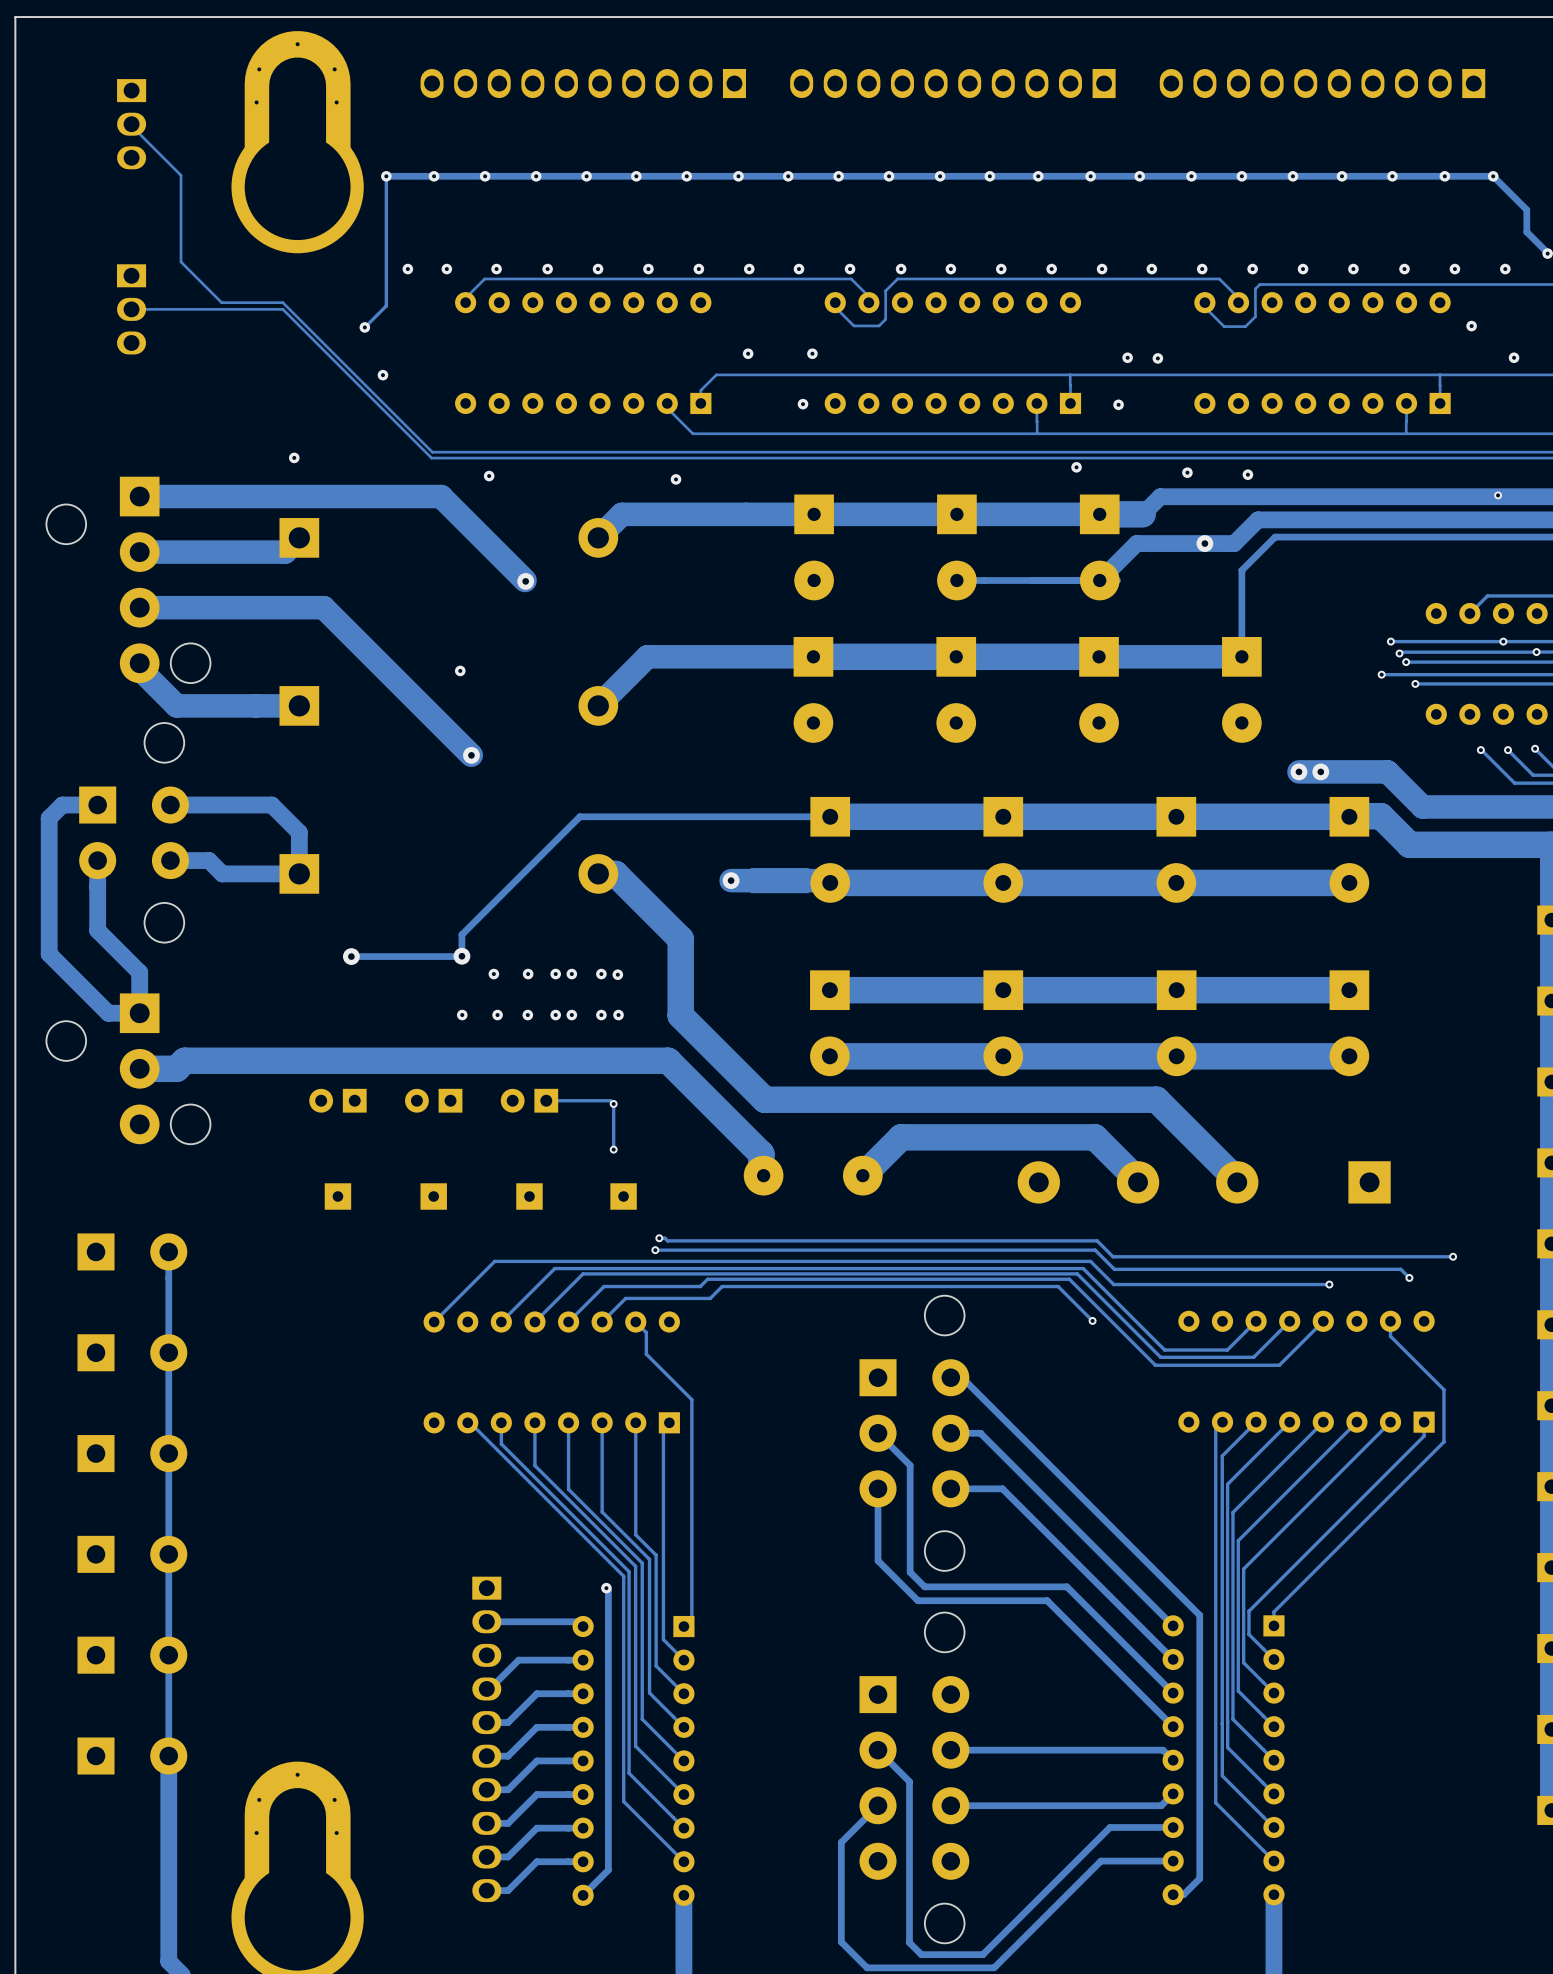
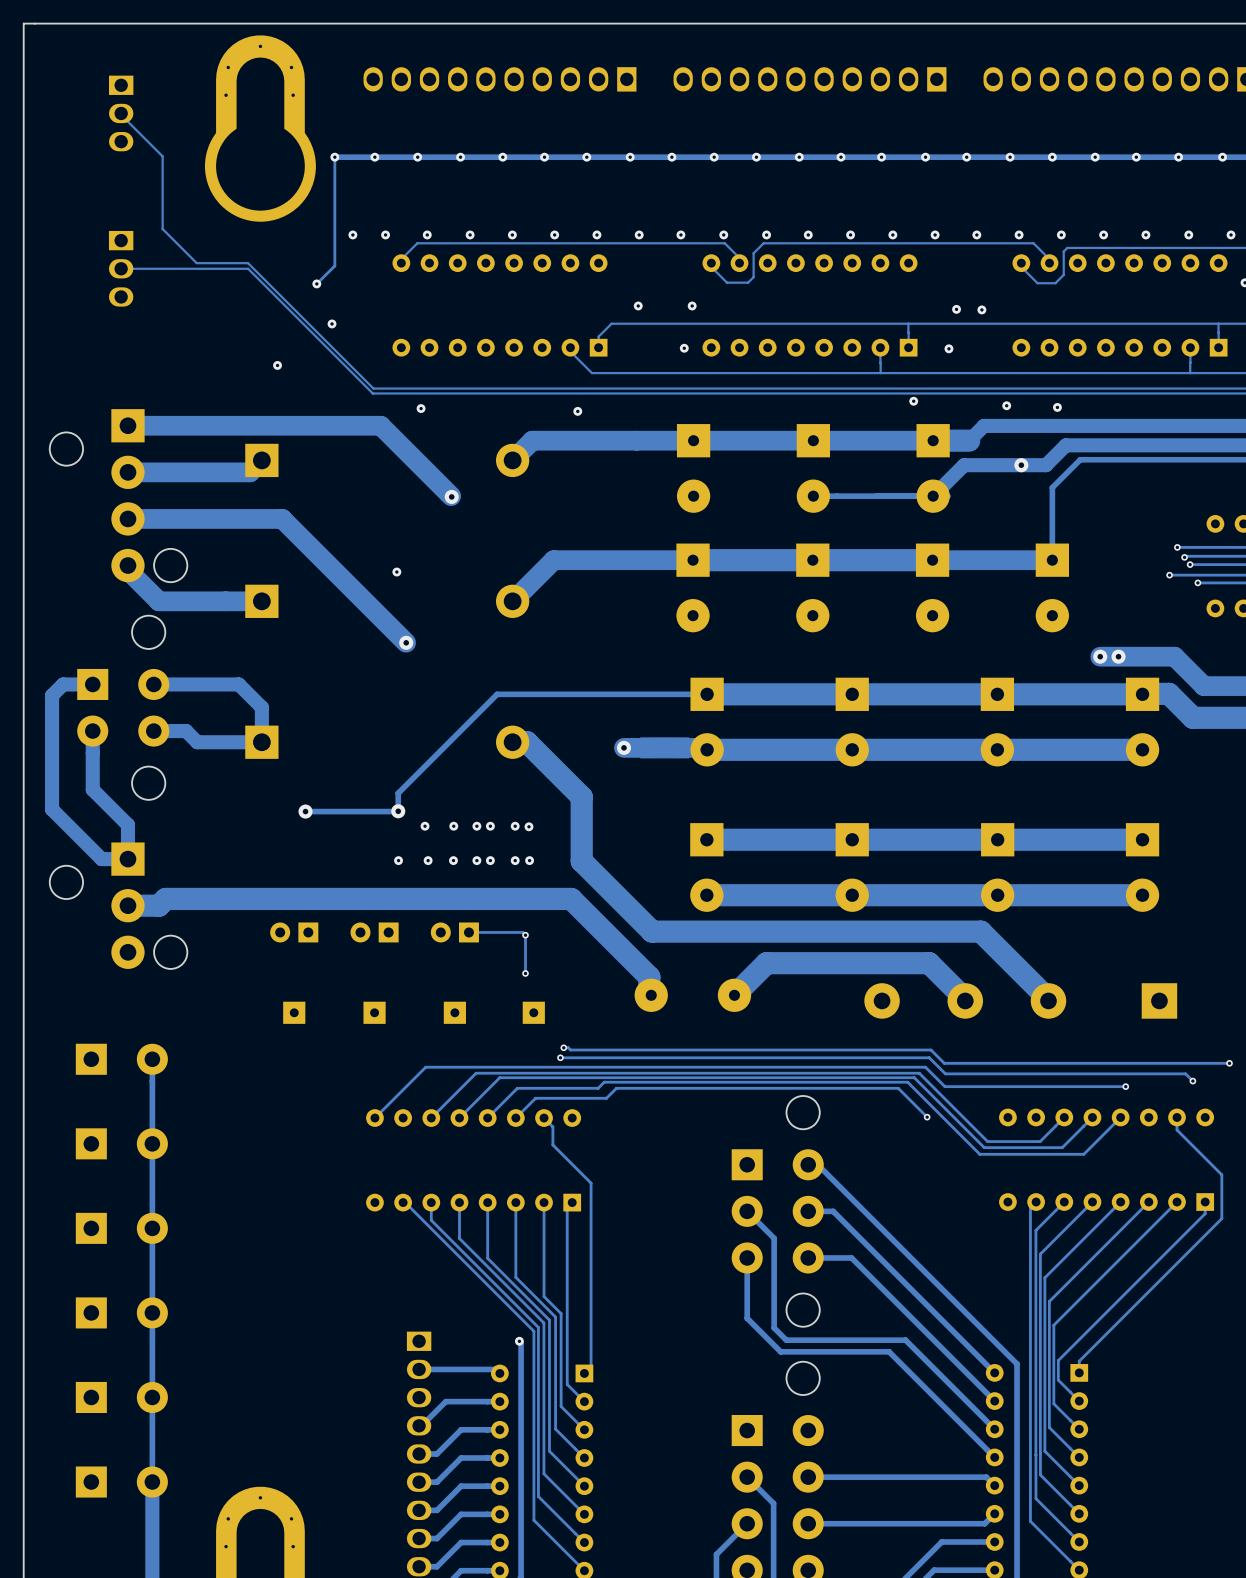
via position: (294, 457) -> (277, 365)

